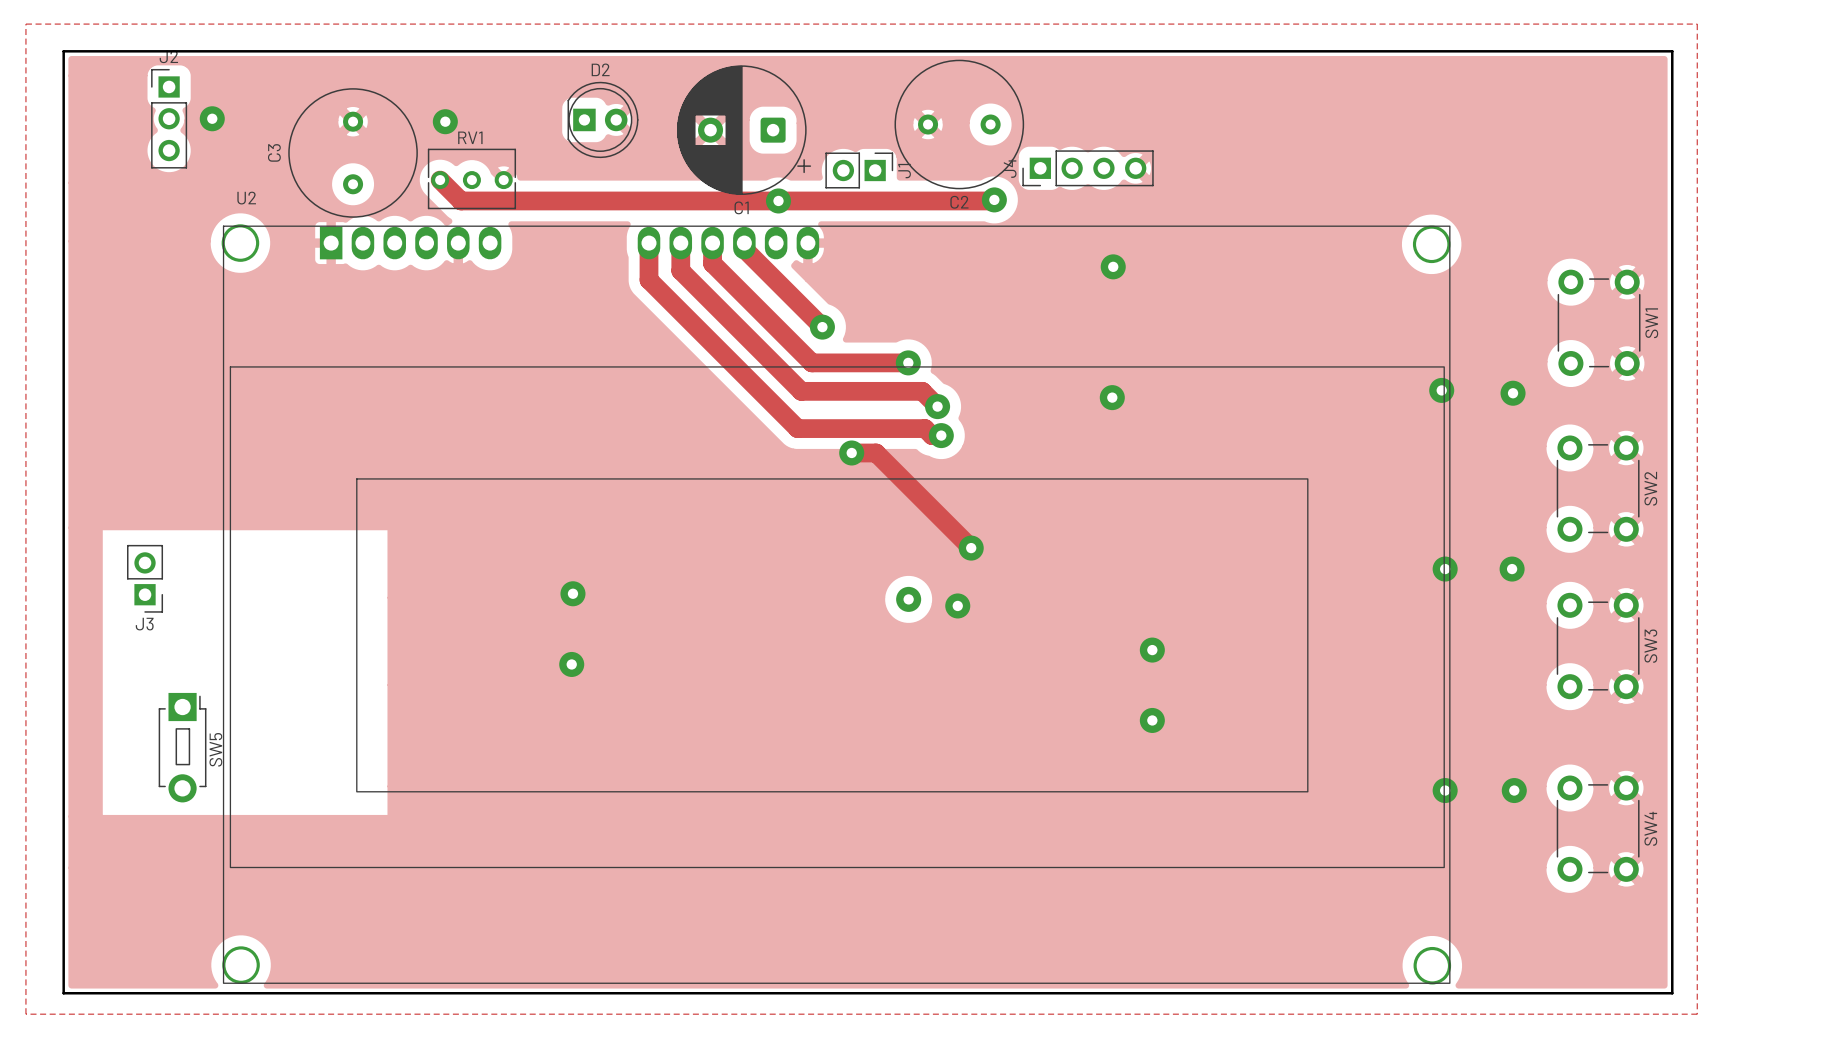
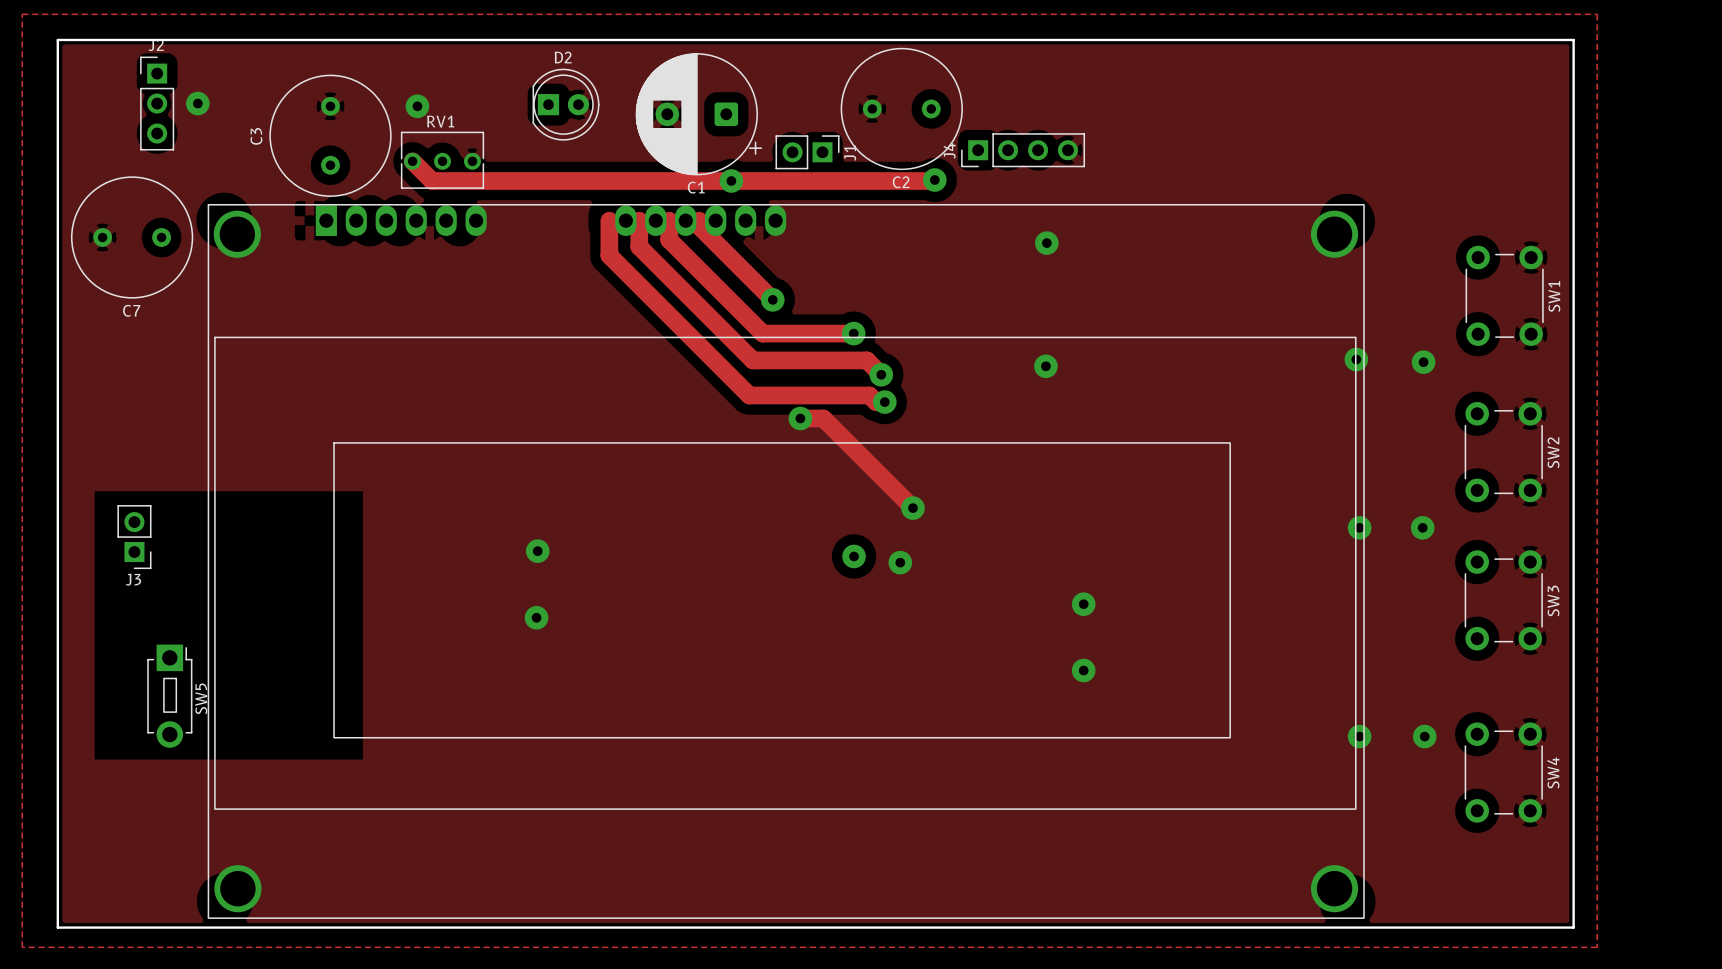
C7: none -> (132, 237)
U2: (836, 604) -> none
part: none -> (786, 561)

